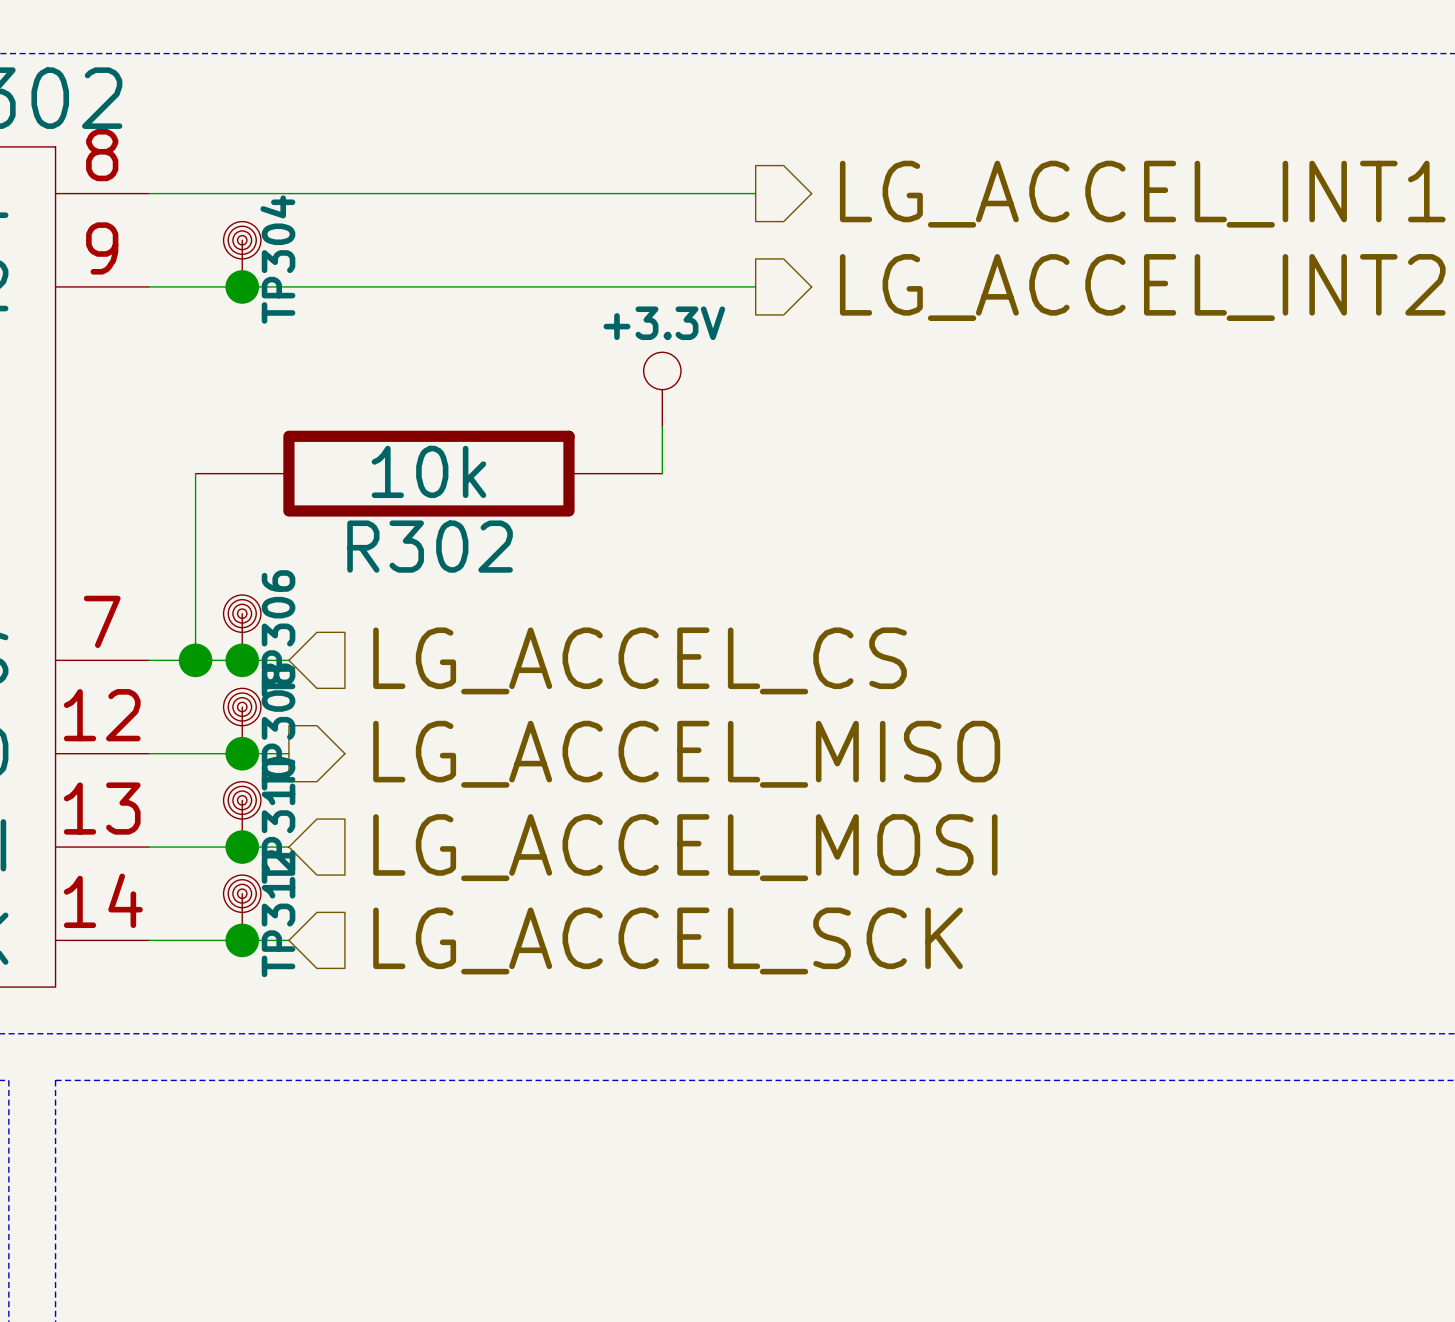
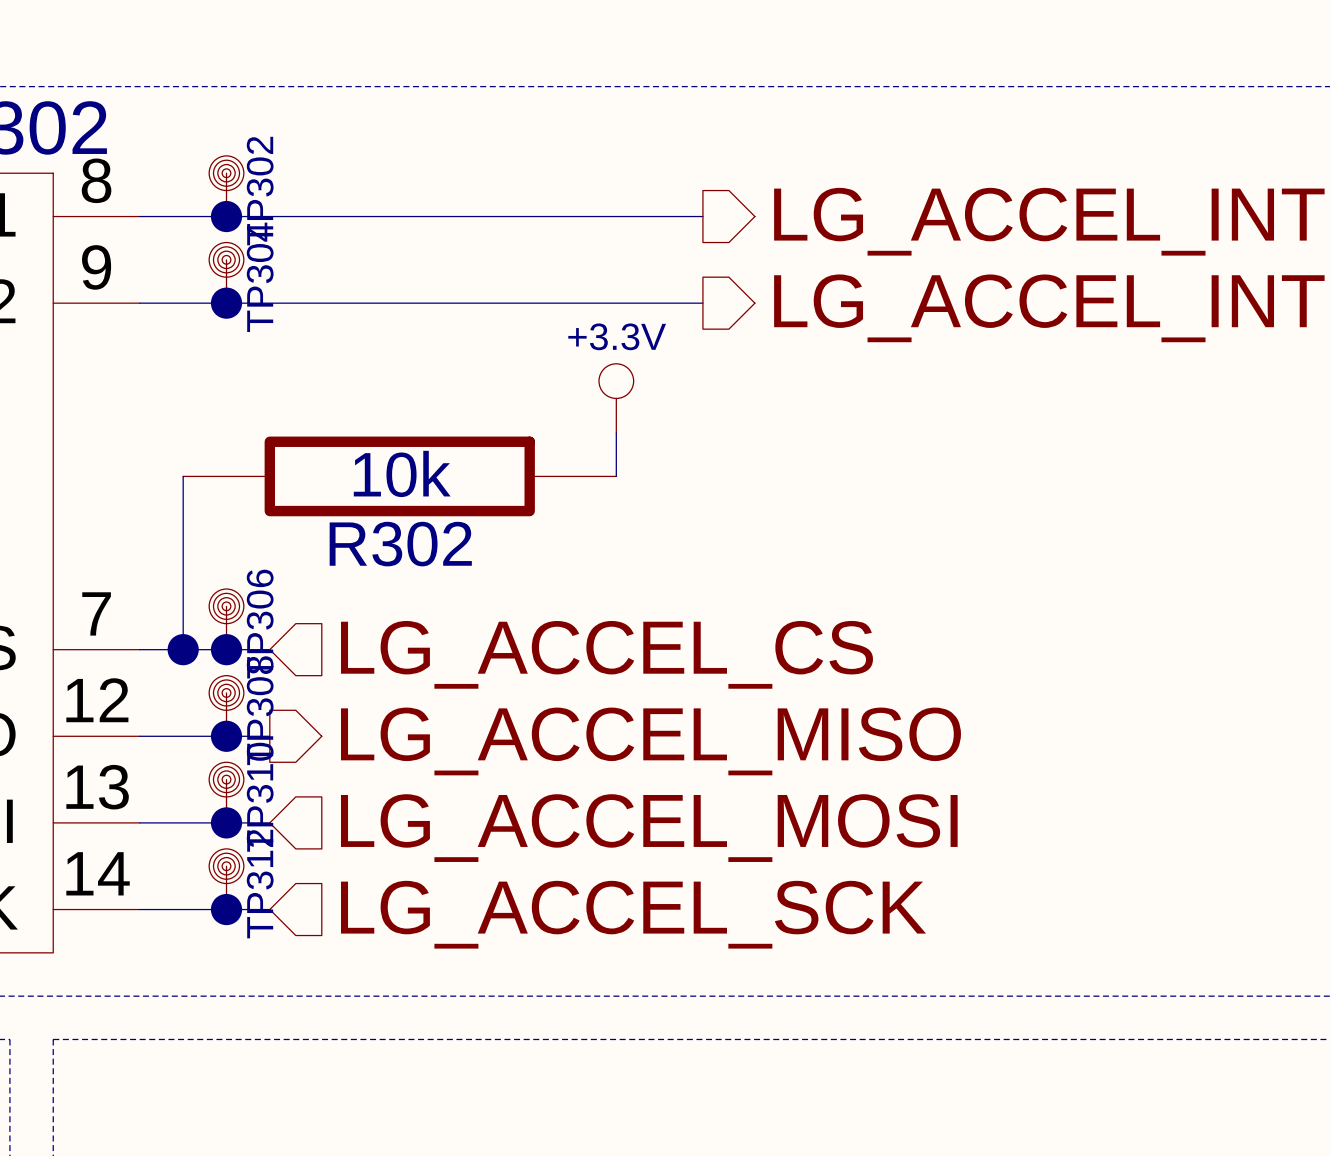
TP302: none -> (226, 186)
junction: none -> (226, 216)

